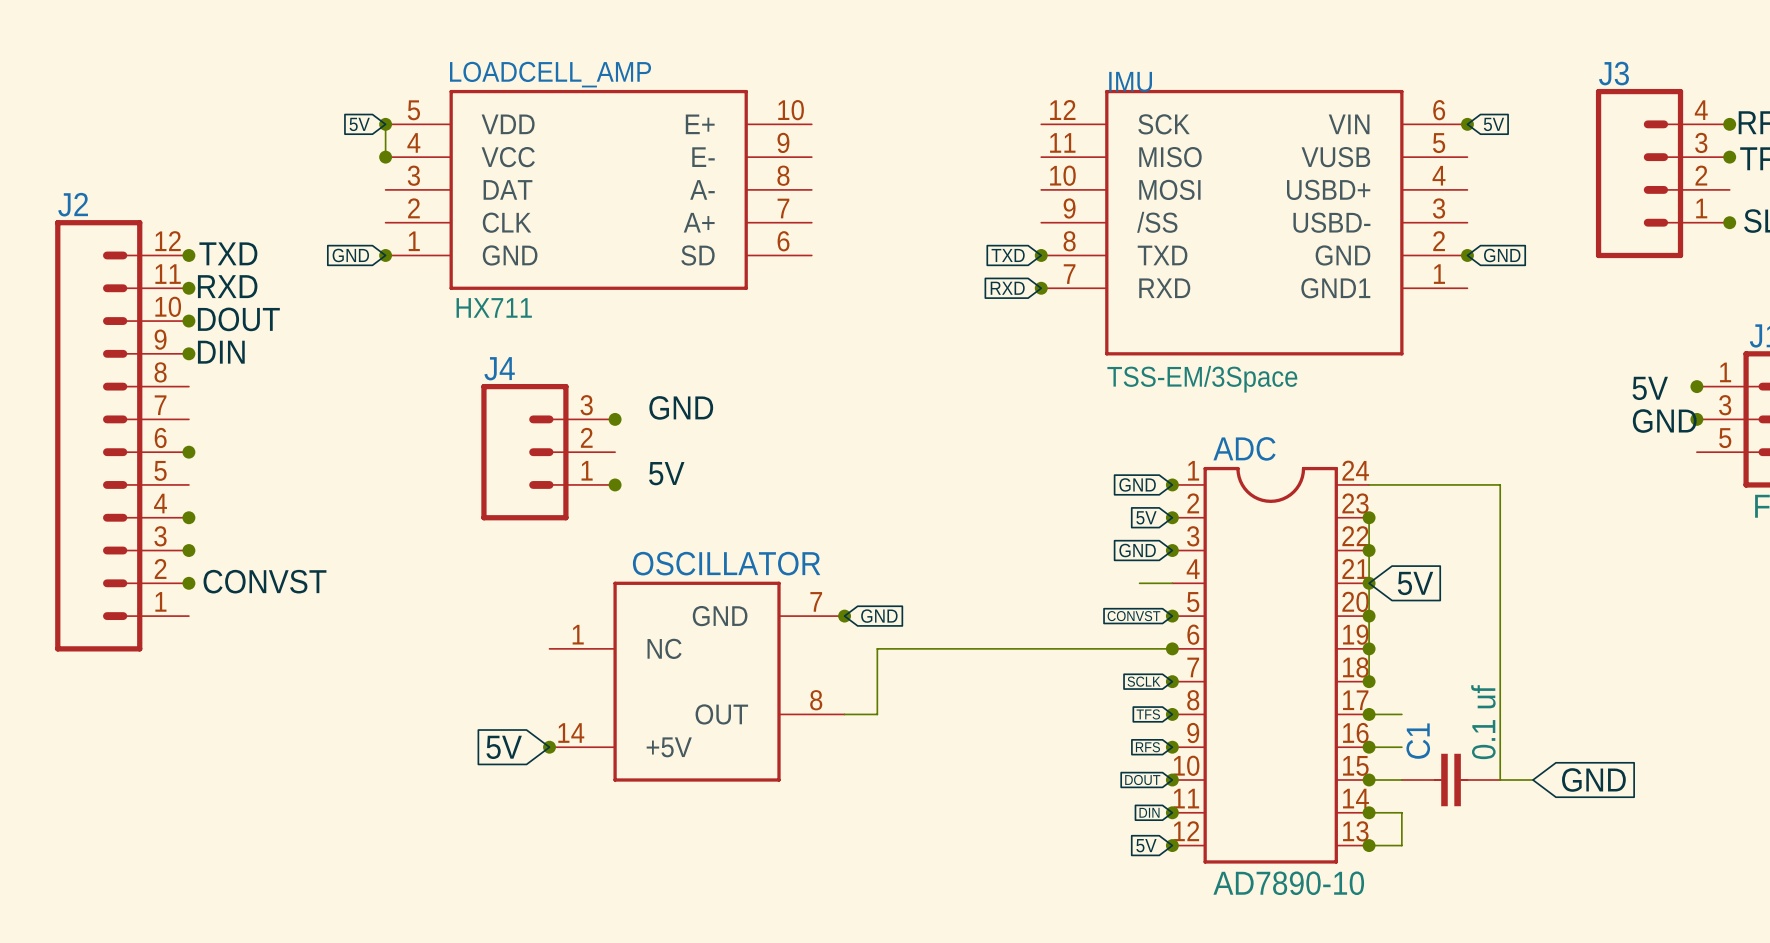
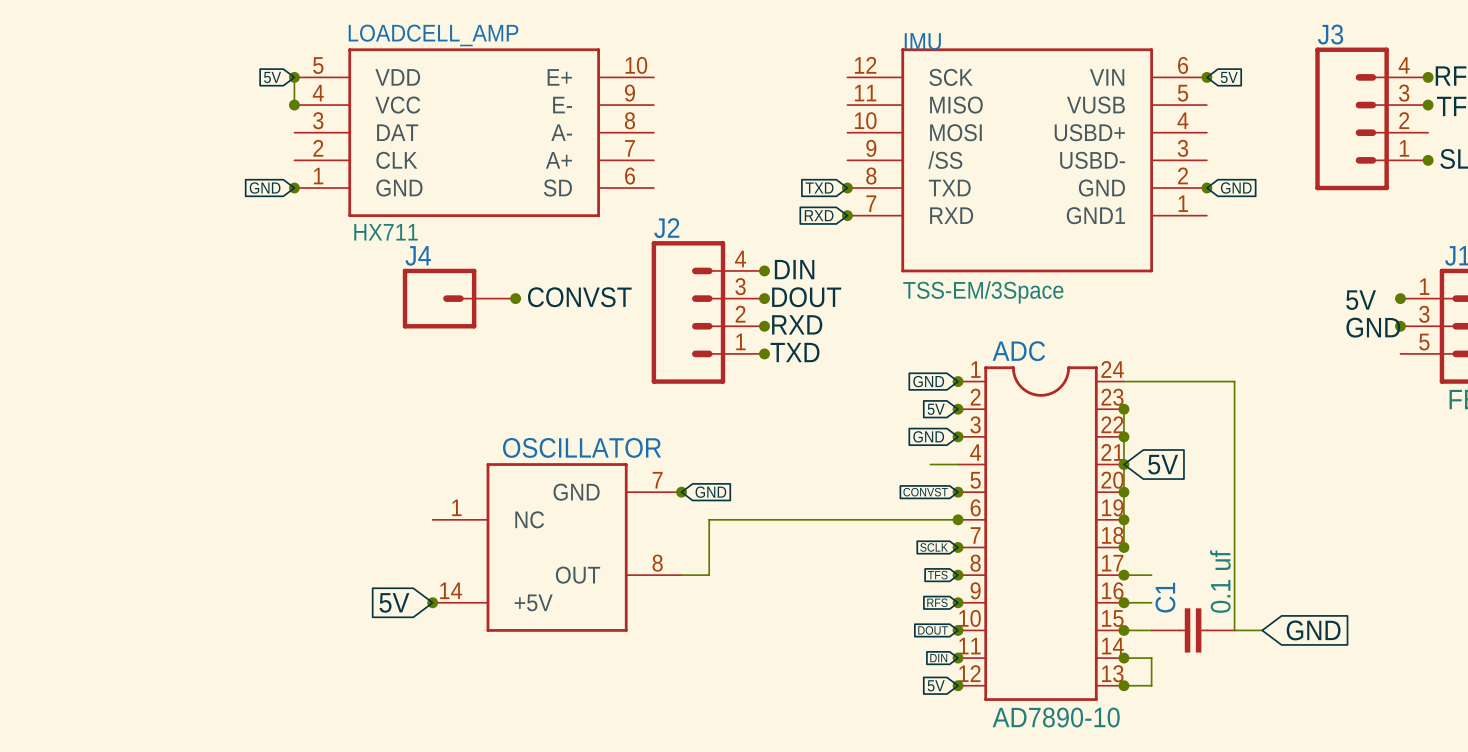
J2 name position: J2 (73, 204) -> J2 (666, 228)
J2 symbol: [55, 220, 189, 652] -> [651, 241, 765, 384]
label: TXD (228, 253) -> none
junction: (188, 255) -> none
label: RXD (227, 286) -> none
junction: (188, 288) -> none
label: DOUT (238, 319) -> none
junction: (188, 321) -> none
label: DIN (221, 352) -> none
label: none -> DIN (794, 269)
junction: (188, 353) -> none
junction: none -> (764, 270)
J4 name position: J4 (499, 368) -> J4 (418, 255)
J4 symbol: [481, 383, 616, 521] -> [402, 268, 516, 329]
label: none -> CONVST (579, 297)
label: none -> DOUT (806, 297)
junction: none -> (764, 298)
label: GND (681, 407) -> none
label: none -> RXD (797, 324)
junction position: (615, 419) -> (515, 298)
junction: none -> (764, 326)
label: none -> TXD (795, 352)
junction: (188, 452) -> none
junction: none -> (764, 353)
label: 5V (666, 473) -> none
junction: (615, 484) -> none
junction: (188, 517) -> none
junction: (188, 550) -> none
label: CONVST (264, 581) -> none
junction: (188, 583) -> none

